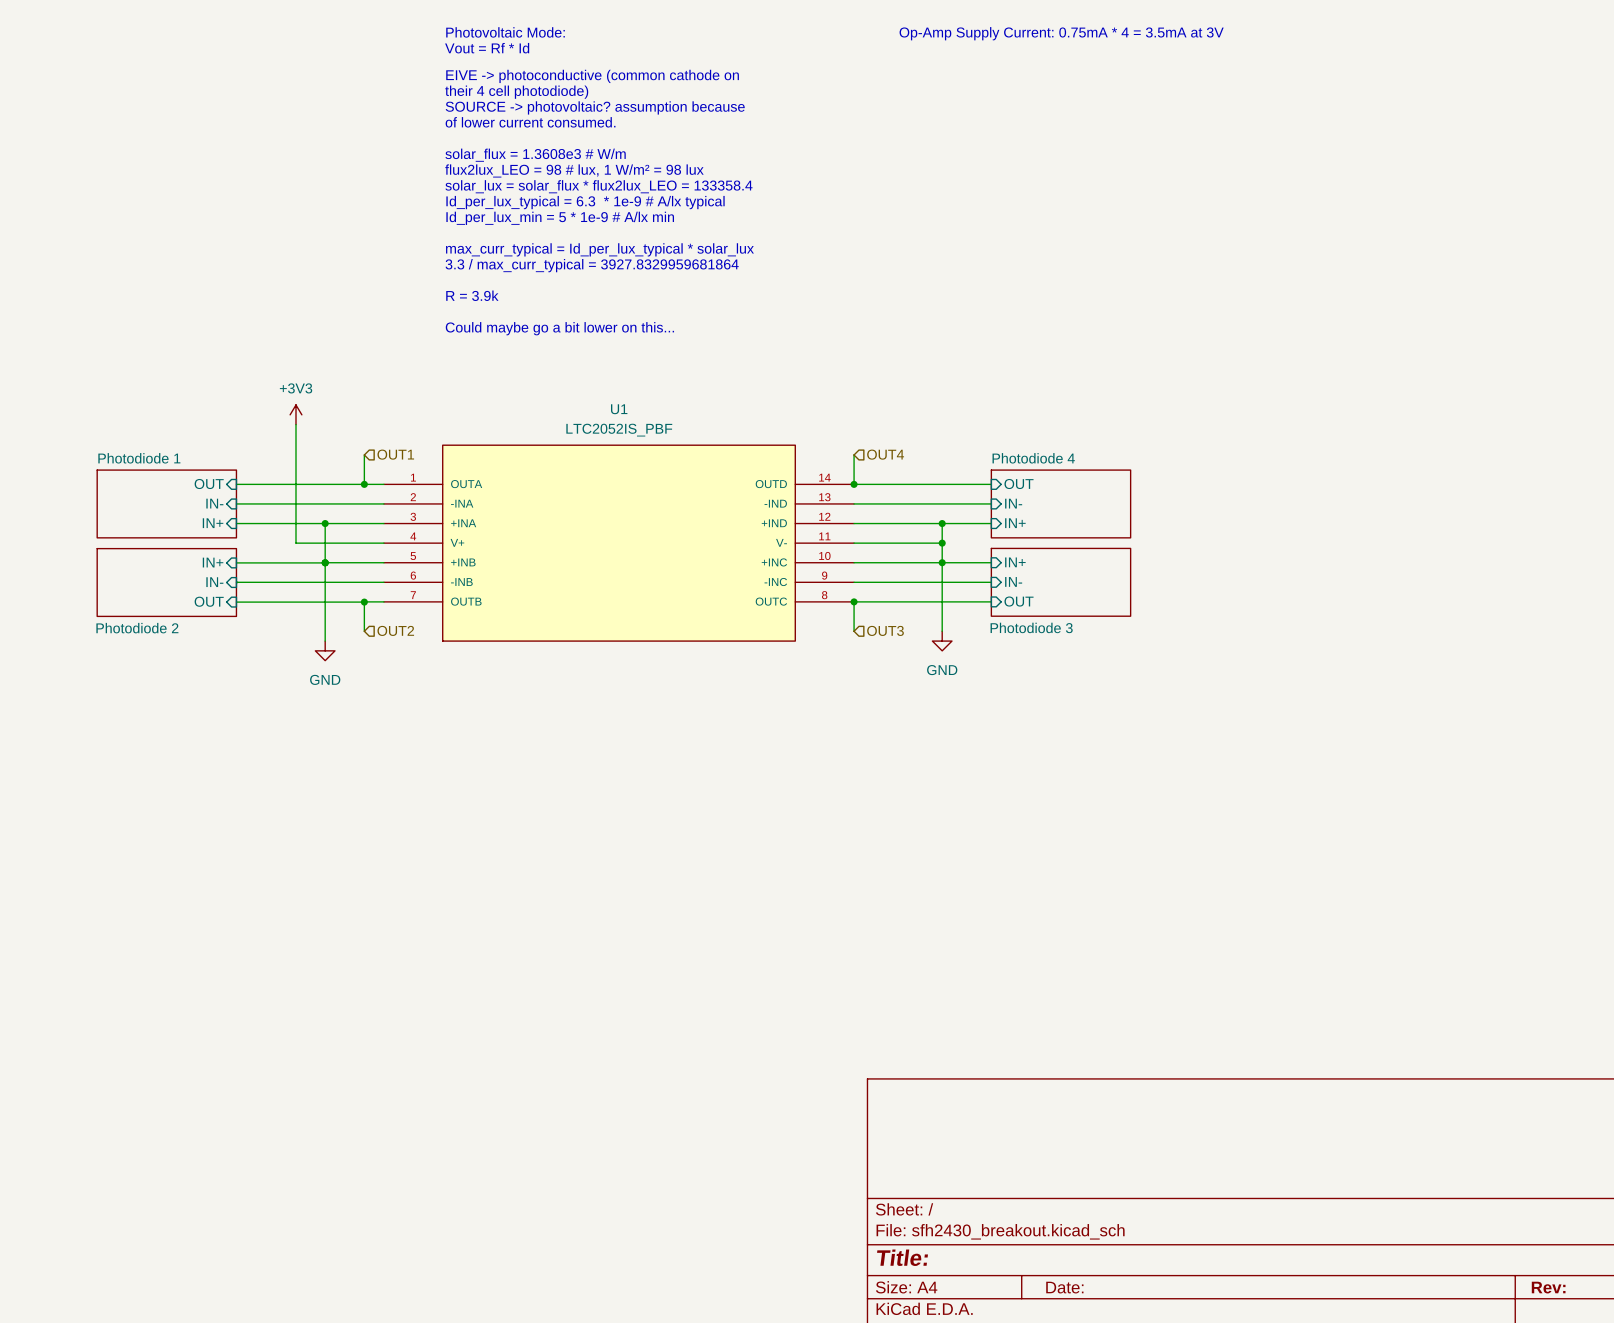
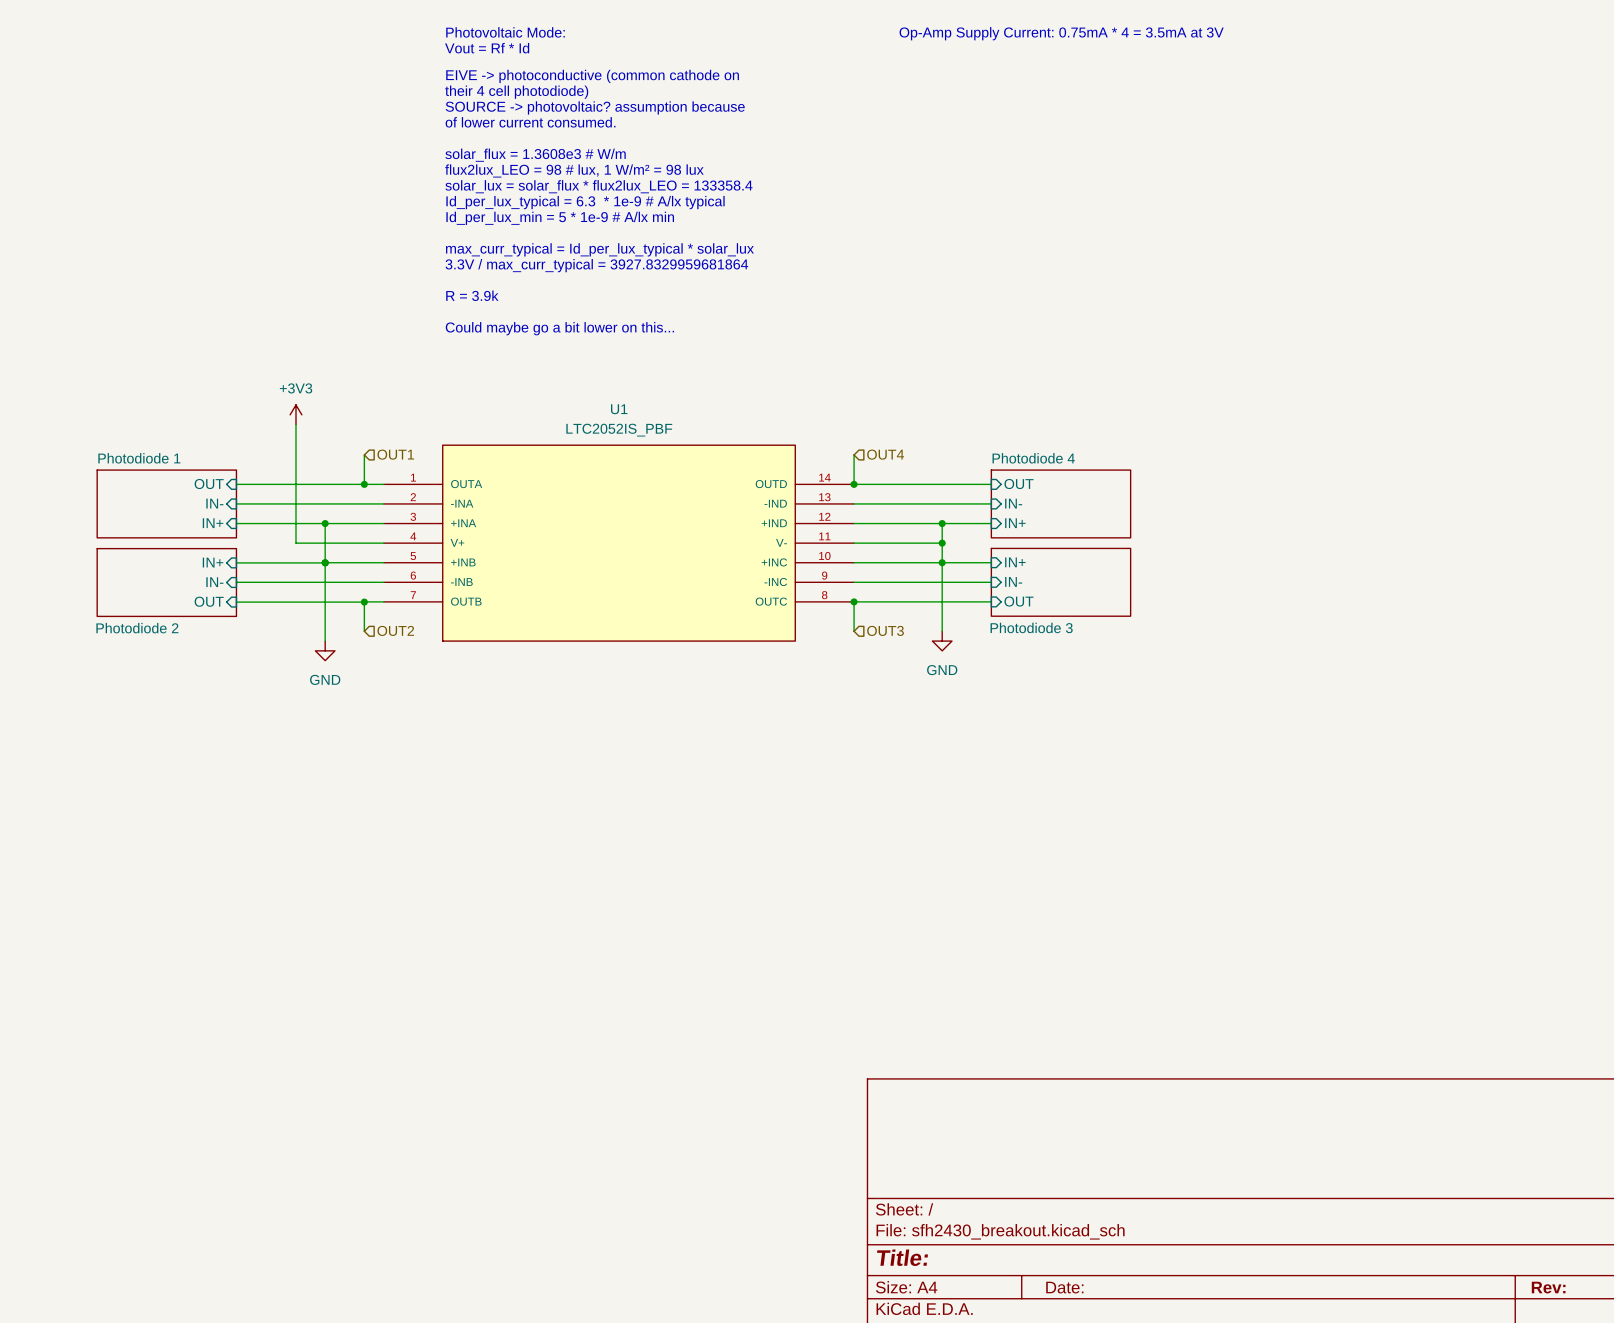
text: 3.3 / max_curr_typical = 3927.8329959681864 (592, 265) -> 3.3V / max_curr_typical = 3927.8329959681864 (596, 265)

